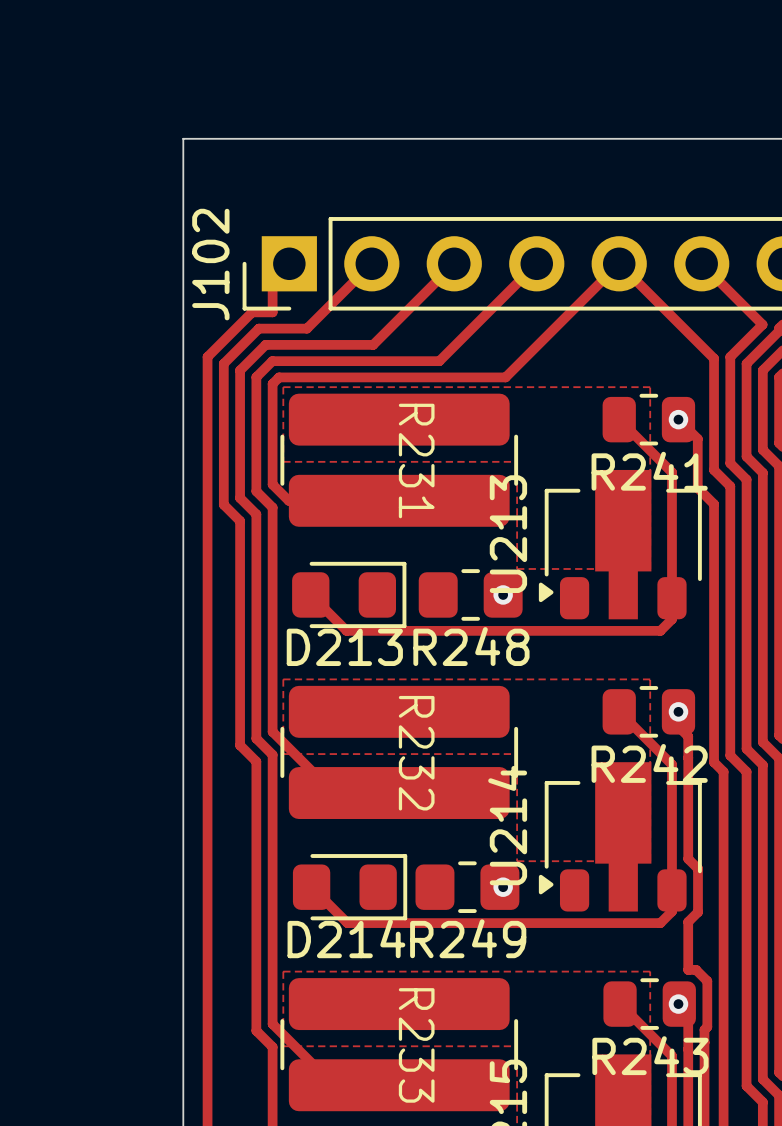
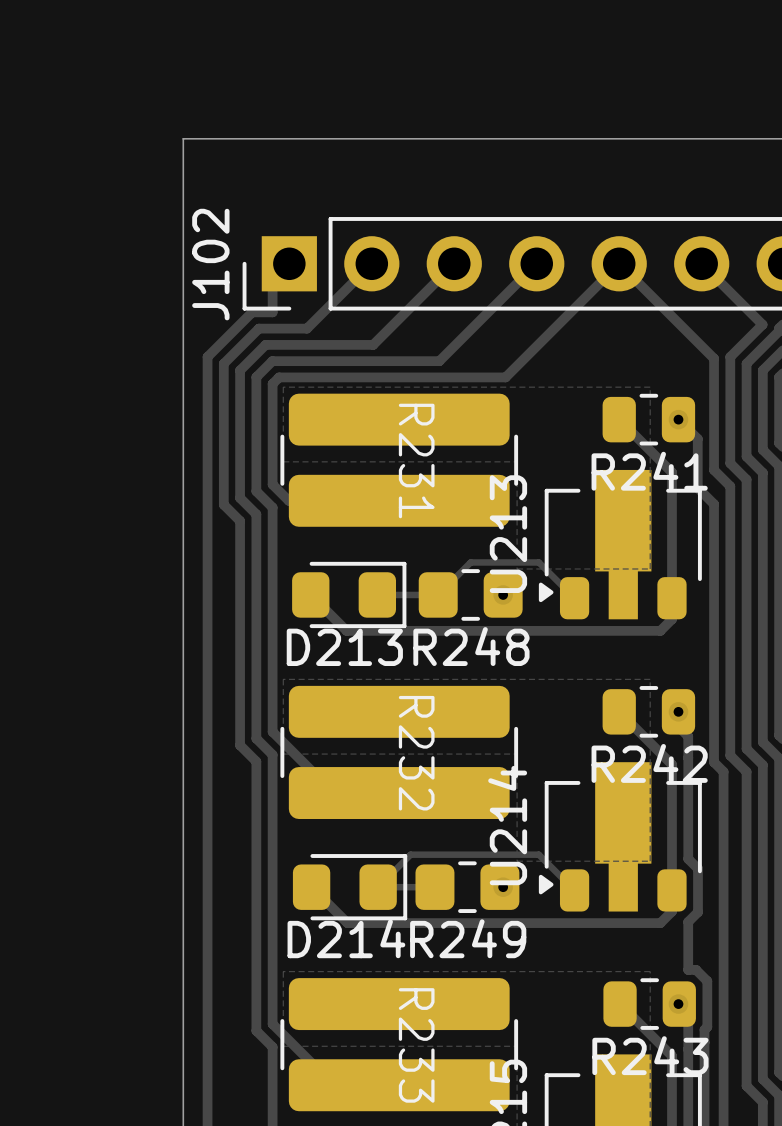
track: none -> (377, 594) (438, 594) (470, 562) (538, 562) (574, 598)
track: none -> (434, 887) (378, 887) (410, 854) (538, 854) (574, 890)

